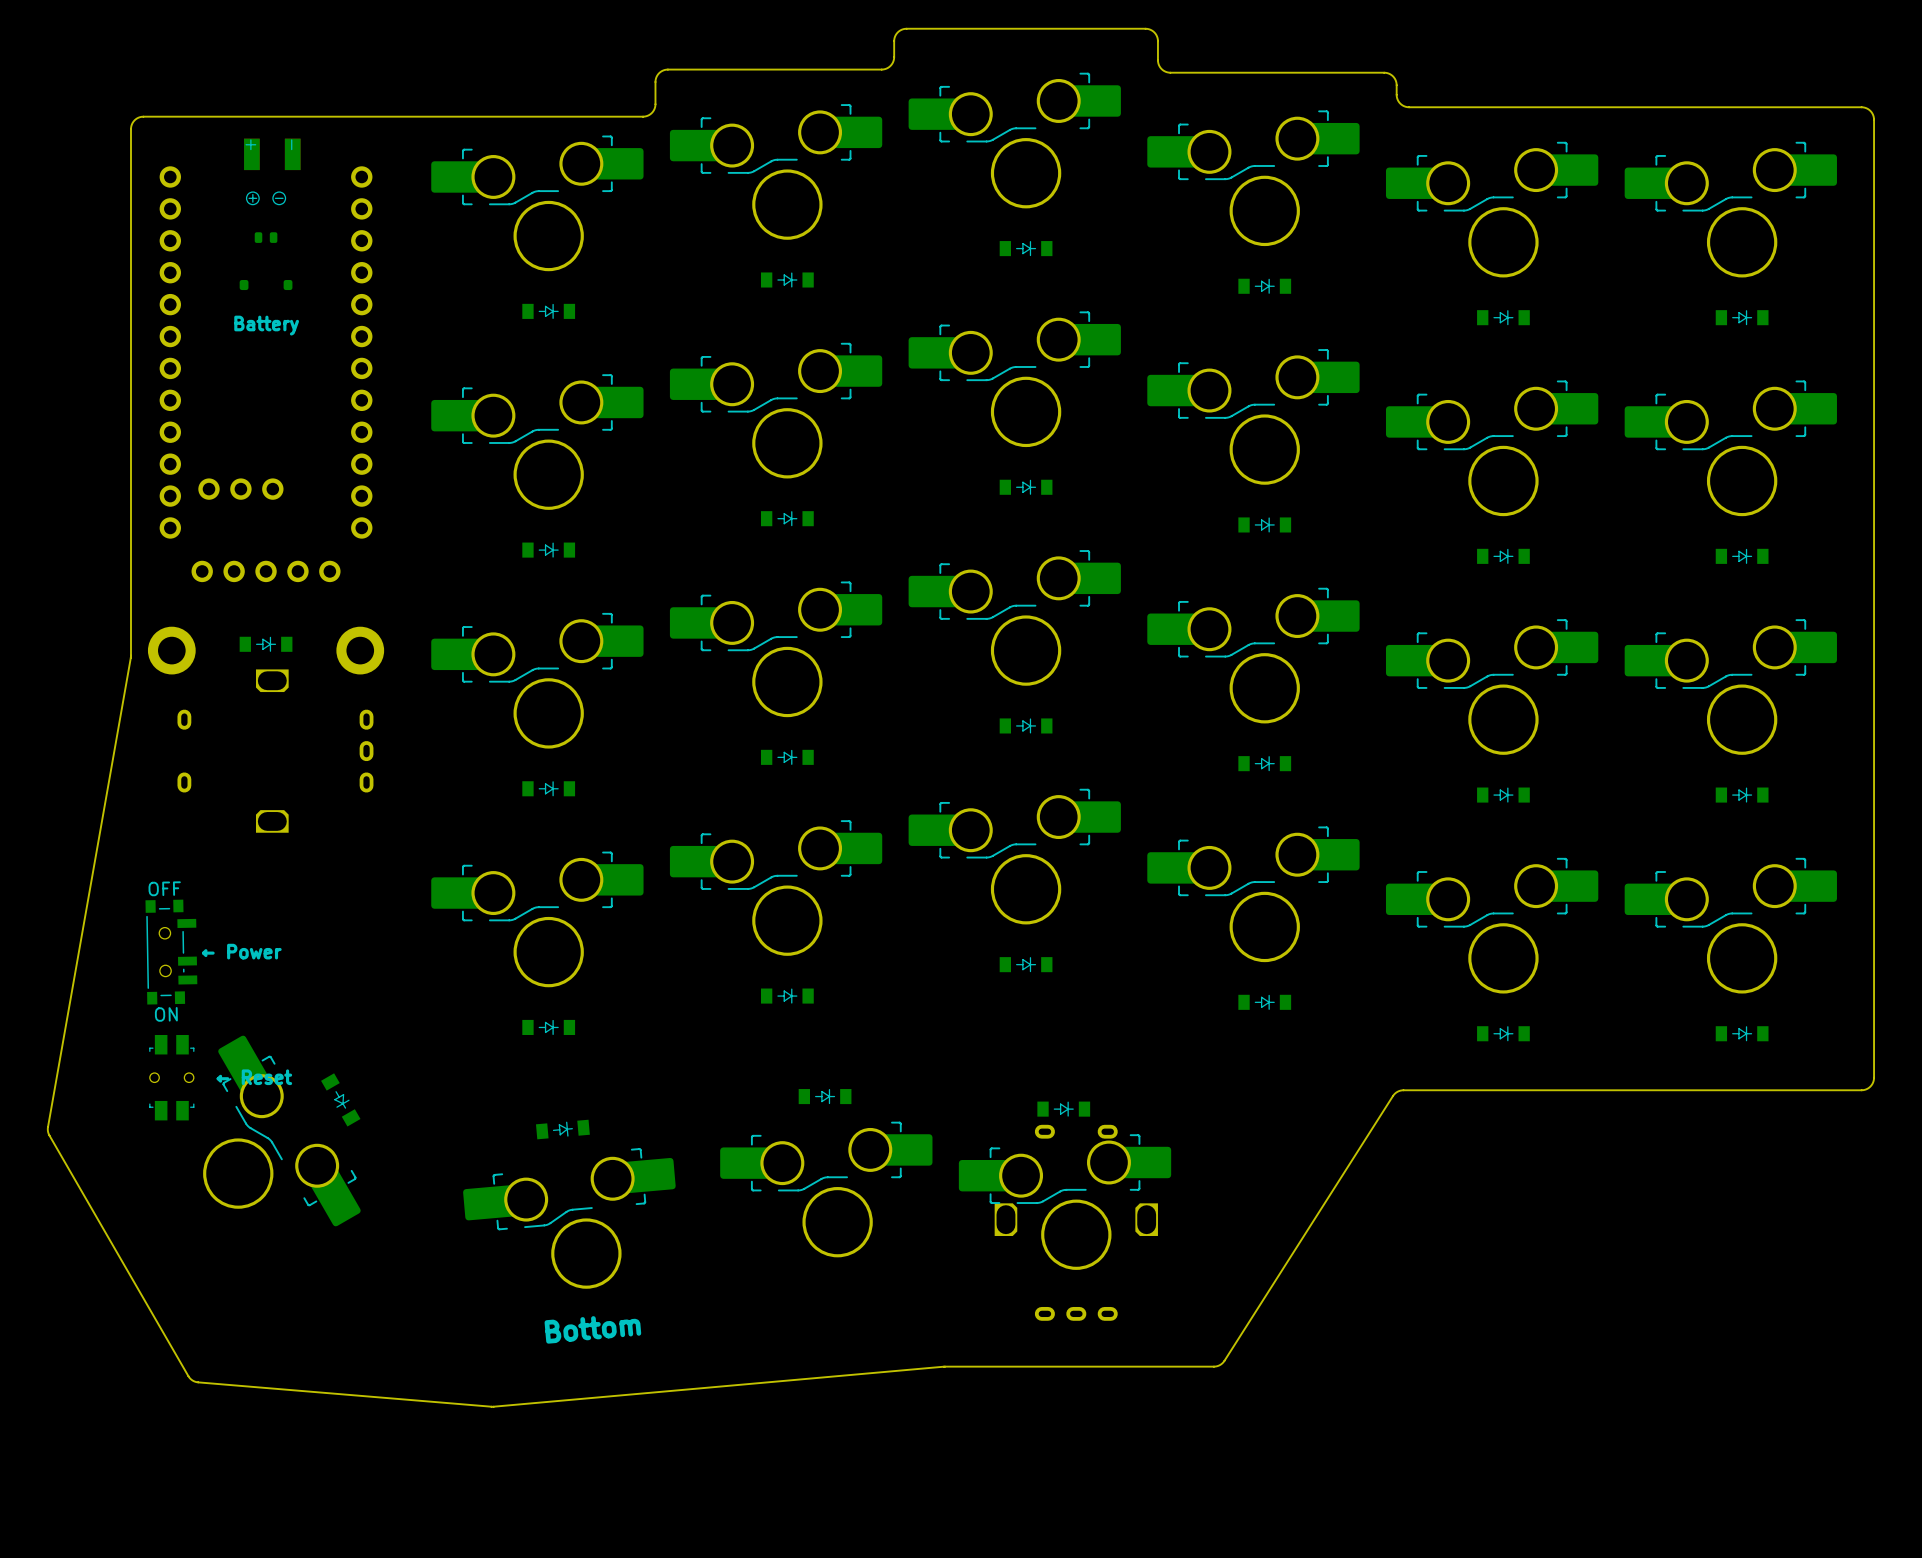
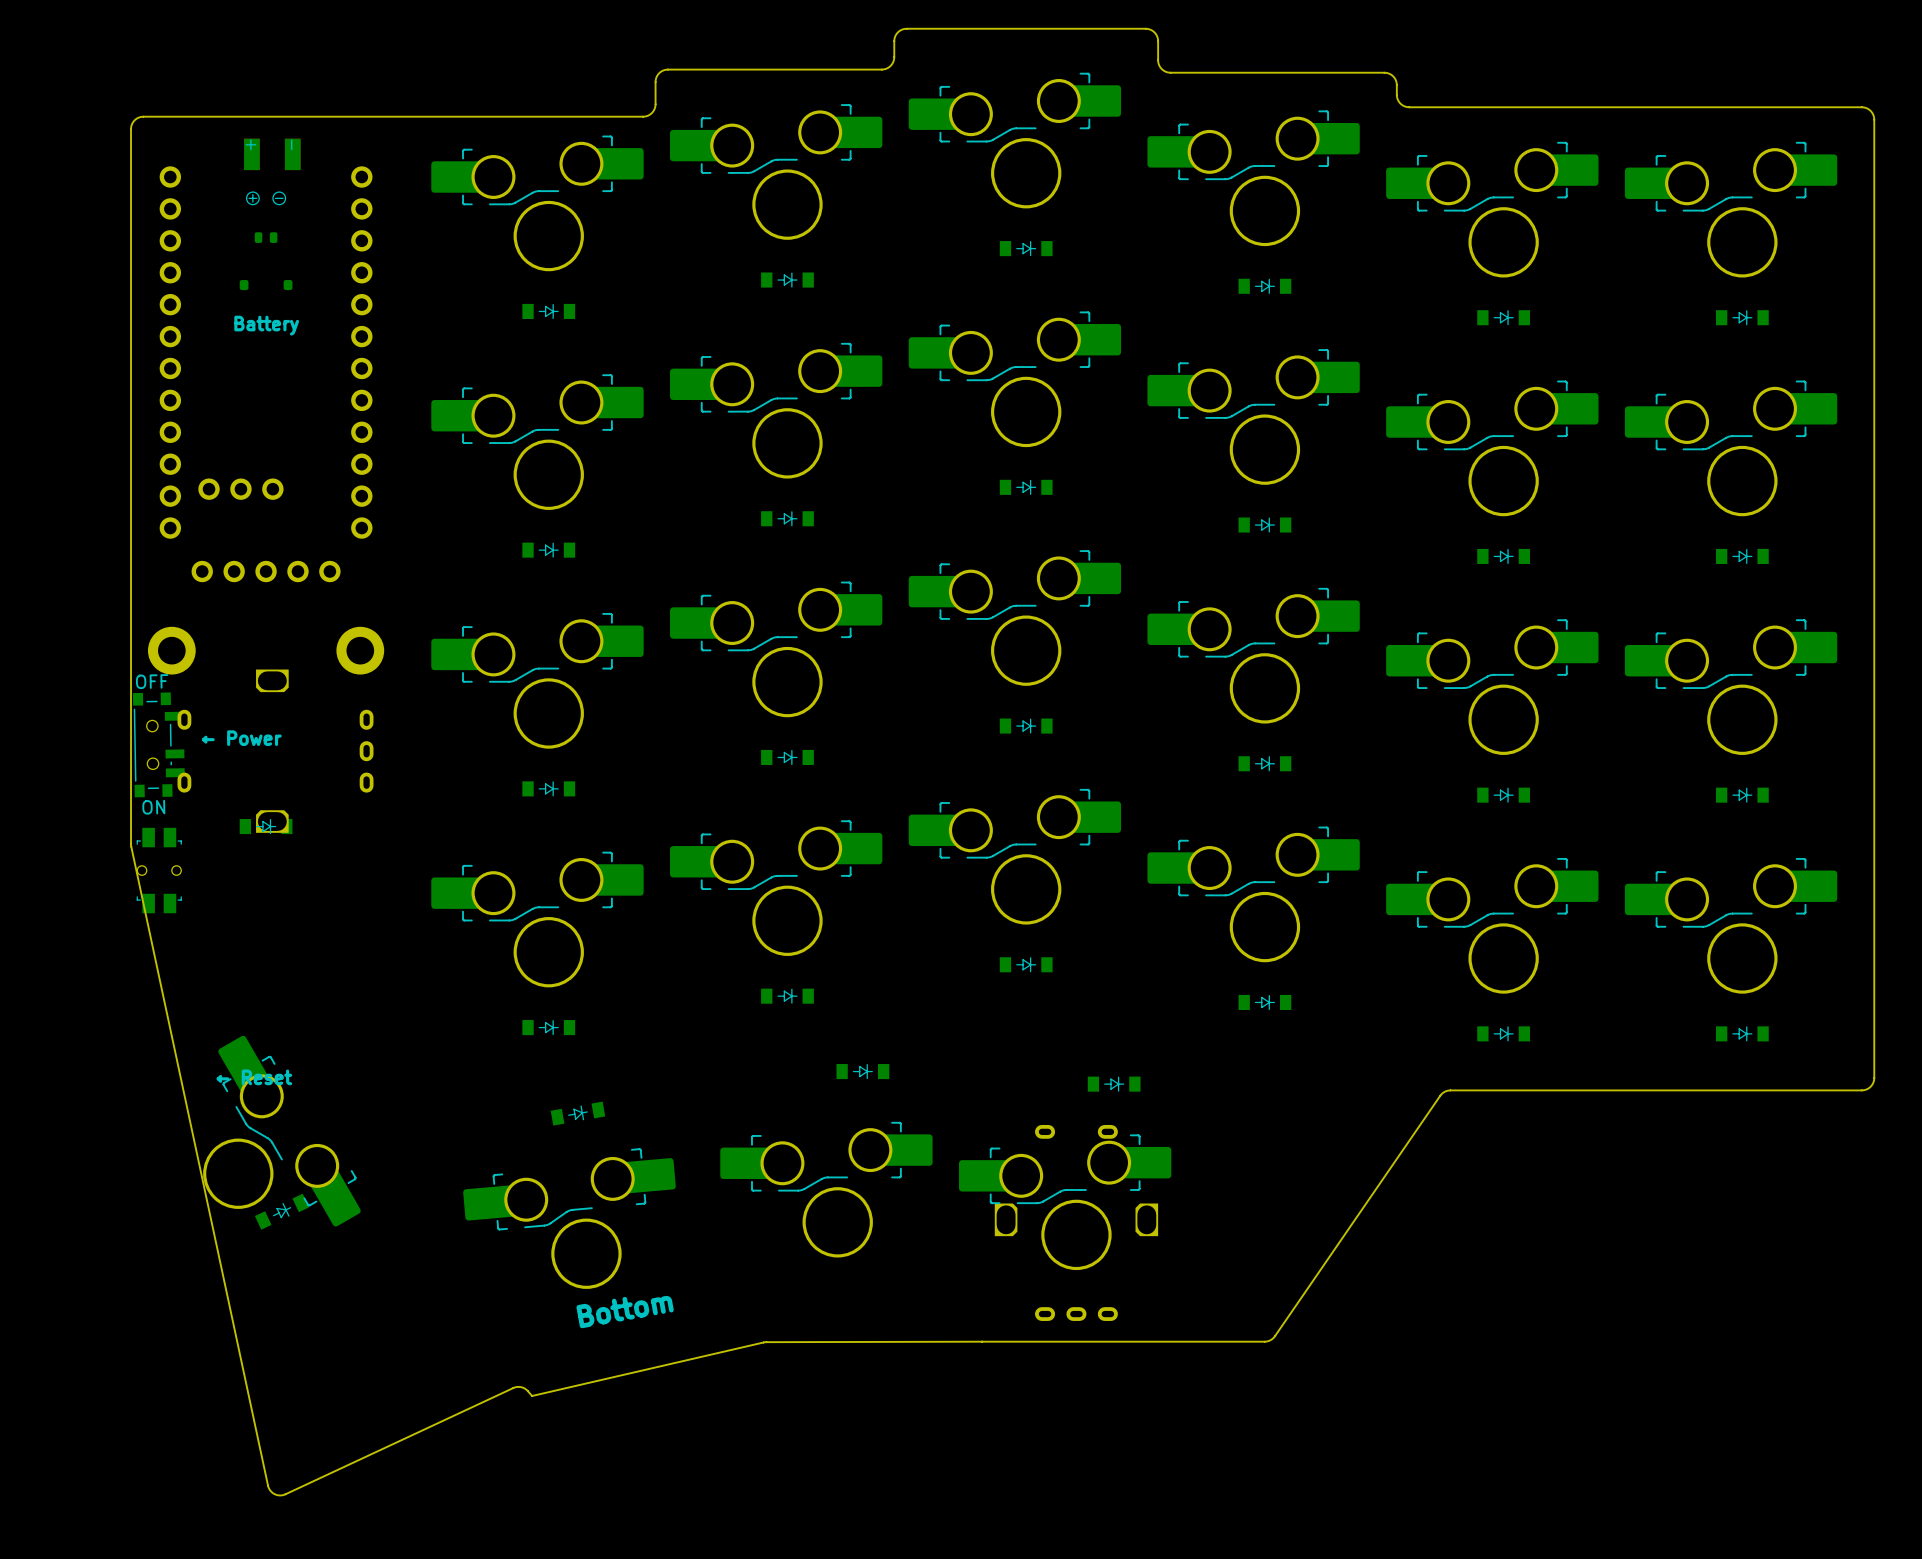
part position: (266, 644) -> (266, 826)
board edge: (130, 655) (47, 1130) (188, 1376) (195, 1381) (492, 1406) (944, 1366) (1217, 1366) (1224, 1360) (1393, 1094) (1401, 1090) (1450, 1090) -> (131, 655) (131, 846) (268, 1485) (272, 1492) (279, 1495) (285, 1494) (516, 1387) (524, 1388) (532, 1396) (764, 1342) (982, 1341)
text position: ← Power (241, 951) -> ← Power (241, 738)
part position: (171, 952) -> (158, 744)
part position: (171, 1077) -> (159, 870)
board edge: none -> (1450, 1090) (1440, 1095) (1270, 1340) (982, 1341)
part position: (825, 1096) -> (862, 1071)
part: (340, 1099) -> none
part position: (1063, 1109) -> (1114, 1084)
part: none -> (577, 1113)
part: (562, 1129) -> none
part: none -> (282, 1211)
text rotation: 0° (592, 1329) -> 5° counterclockwise (625, 1312)

